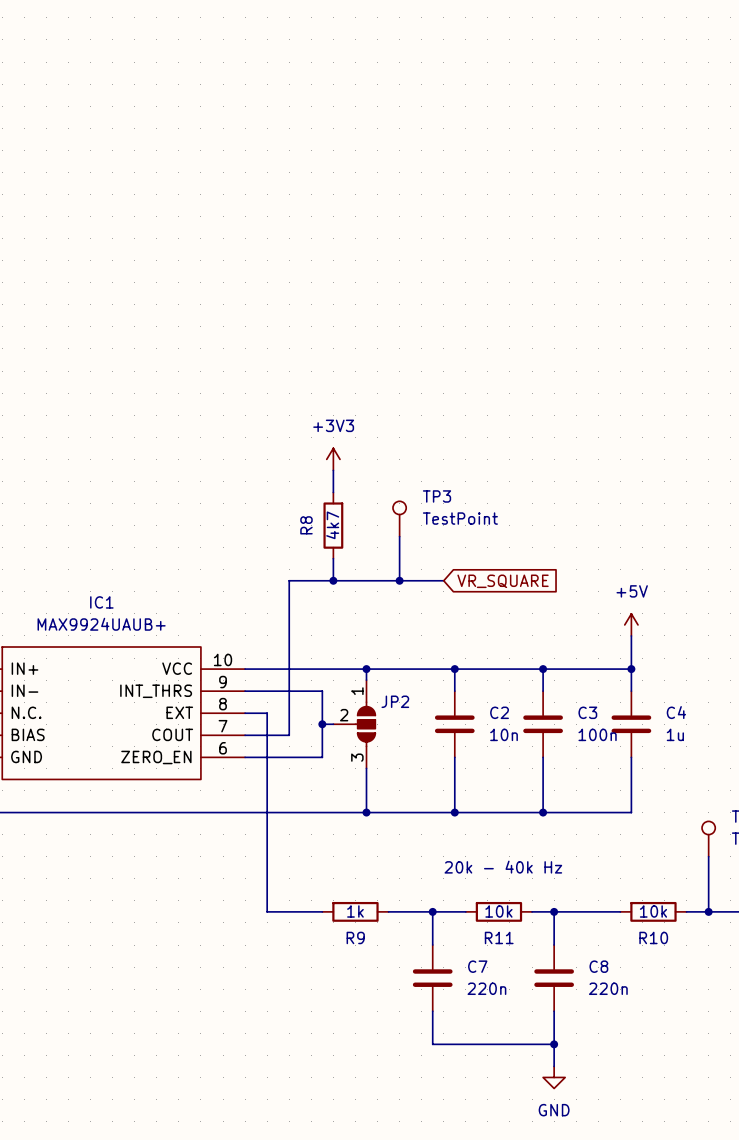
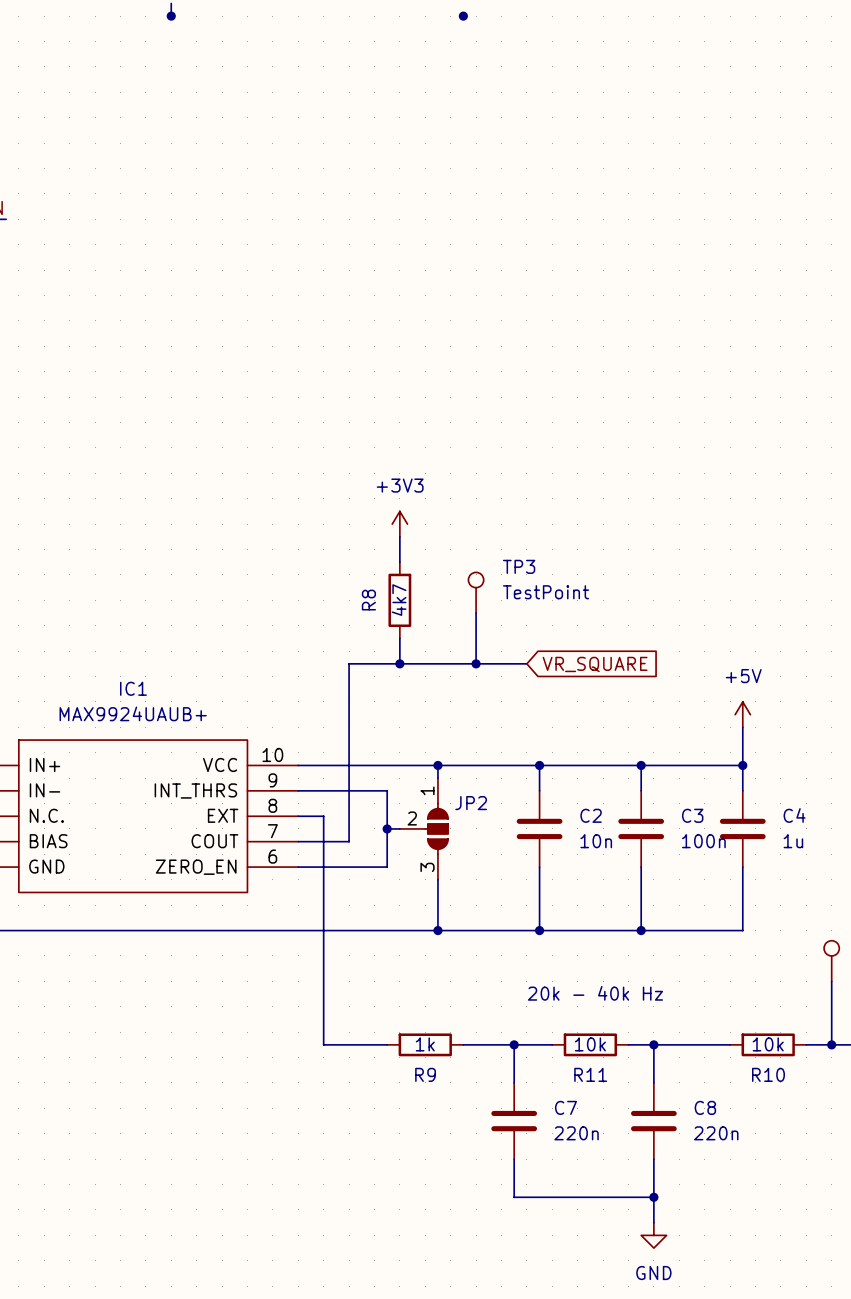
wire: none -> (171, 3) (171, 16)
junction: none -> (171, 16)
junction: none -> (463, 16)

